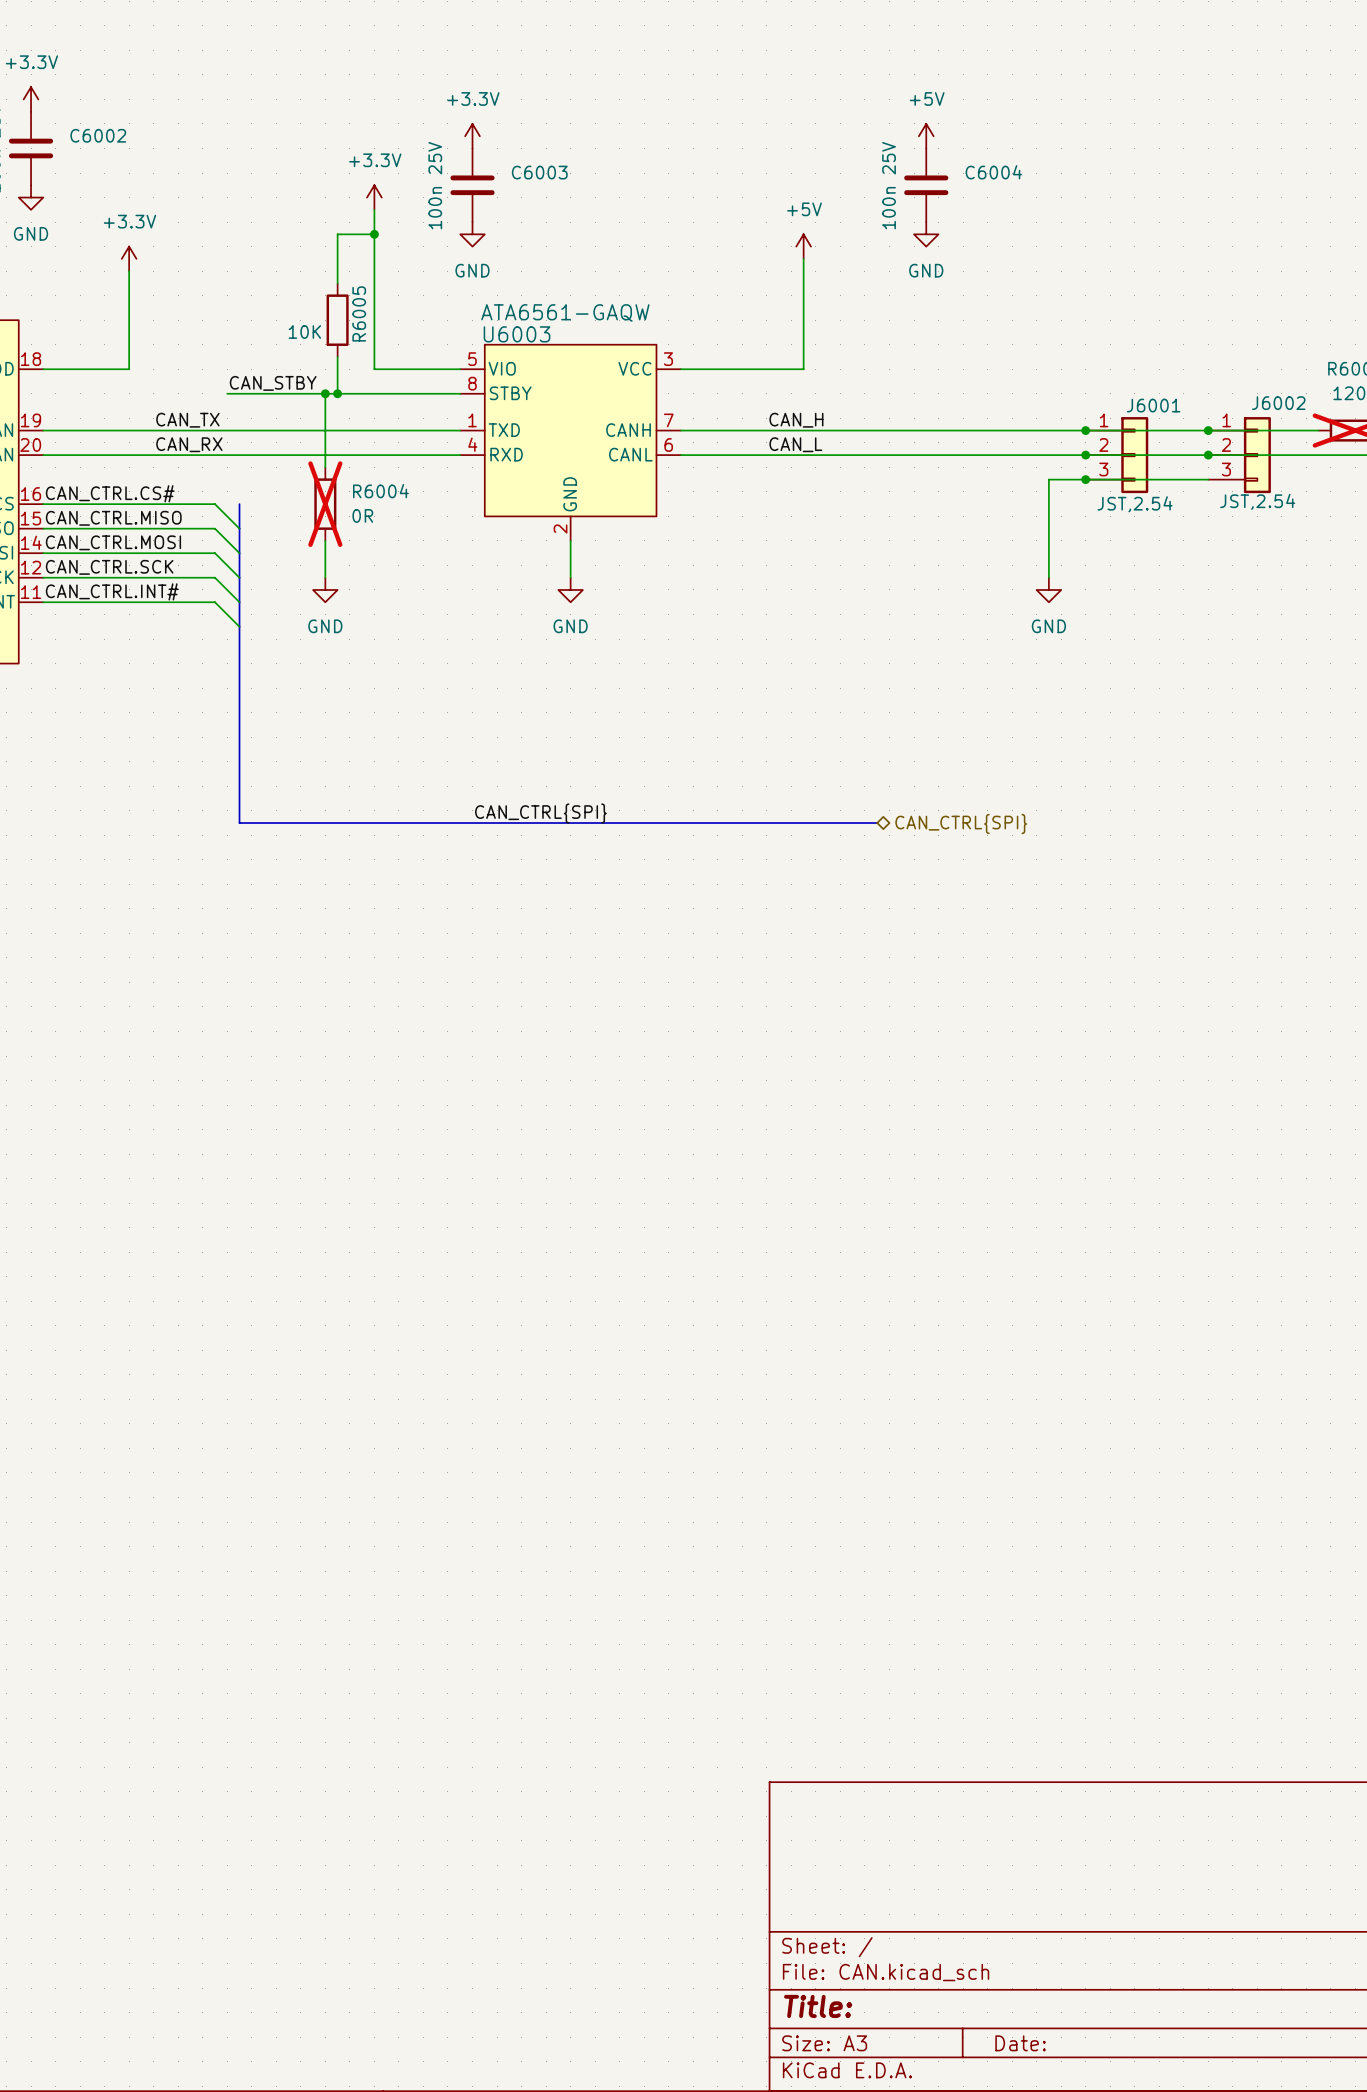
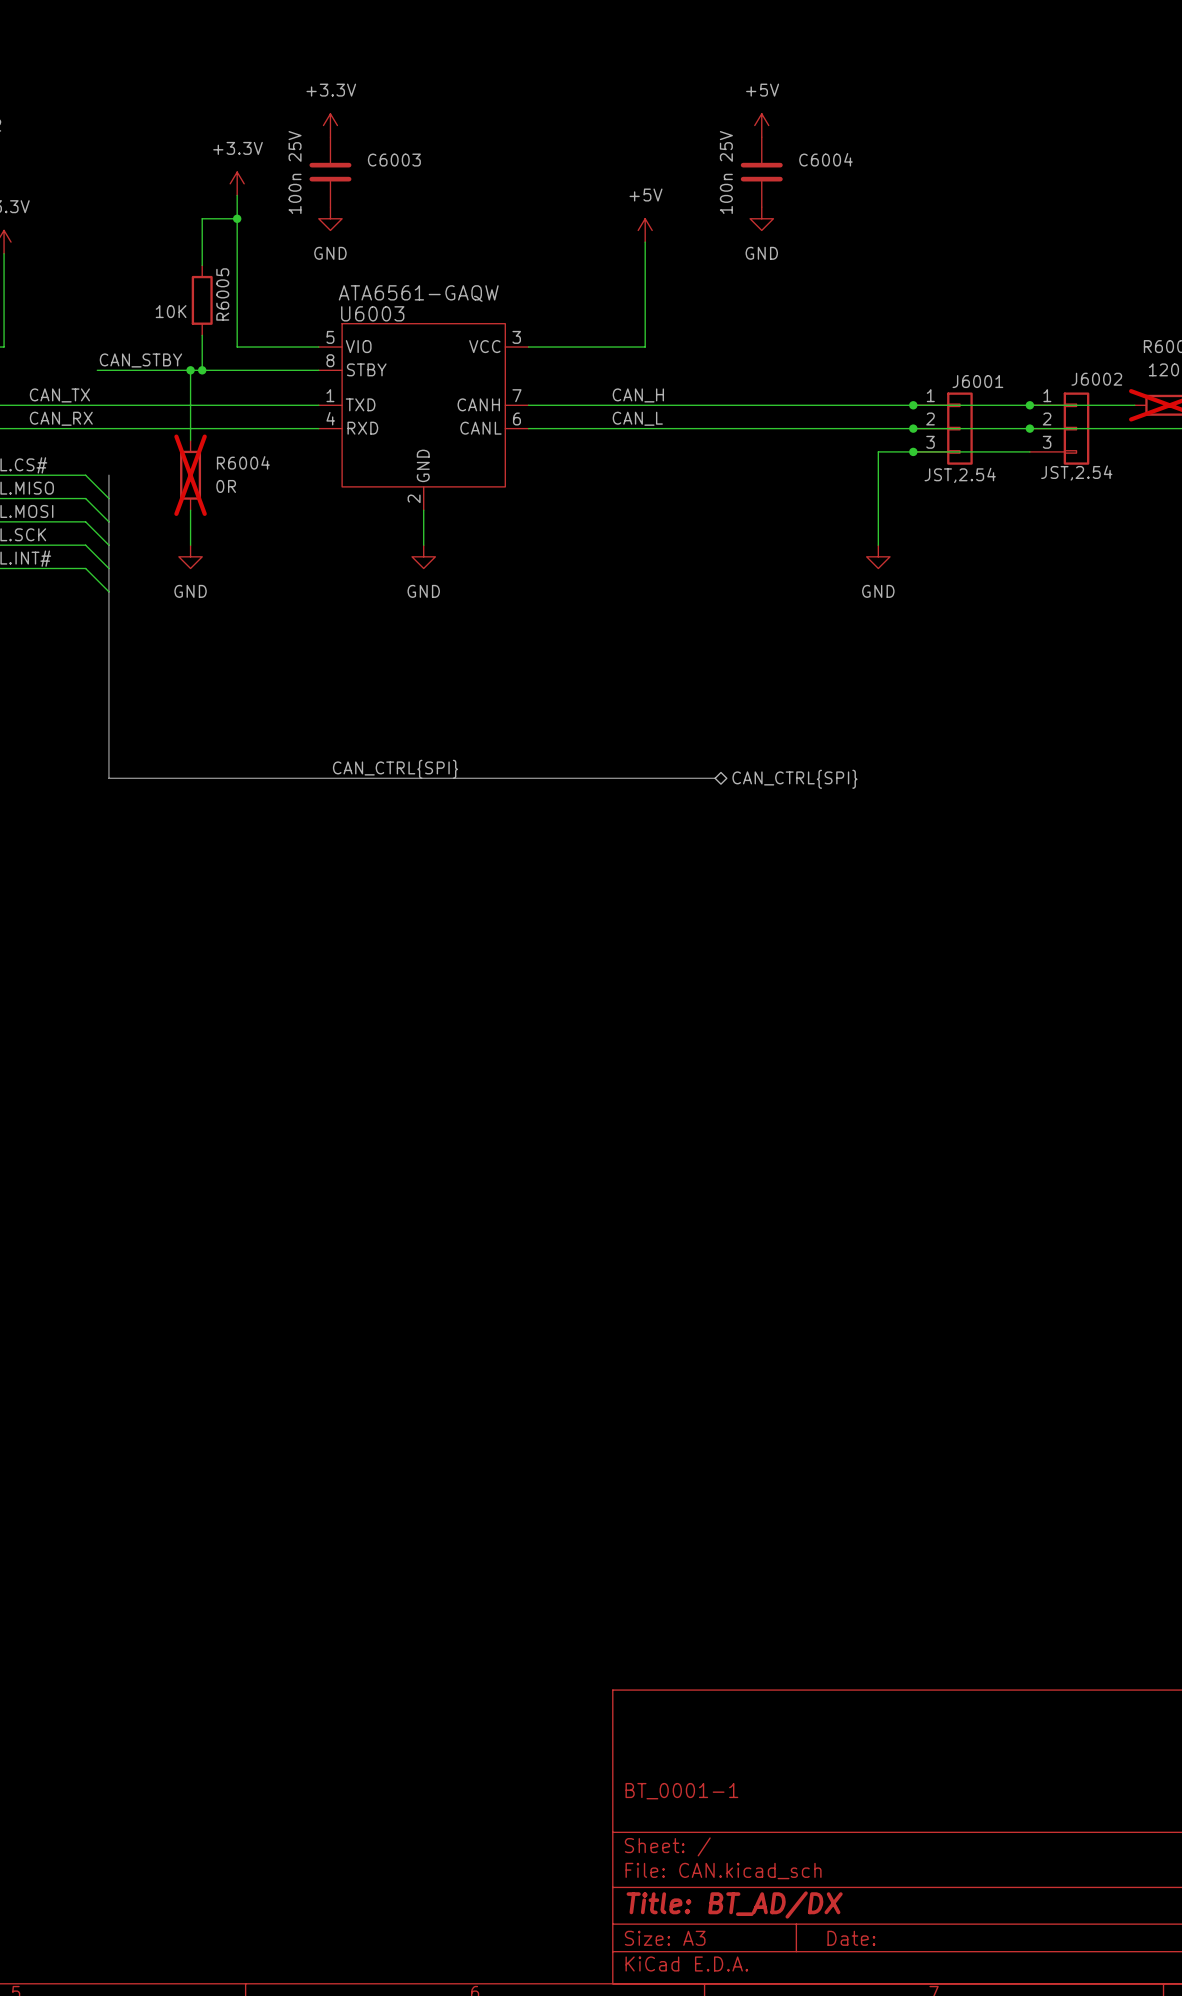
title block: none -> BT_0001-1 (681, 1791)
title block: Title: (818, 2006) -> Title: BT_AD/DX (734, 1904)

